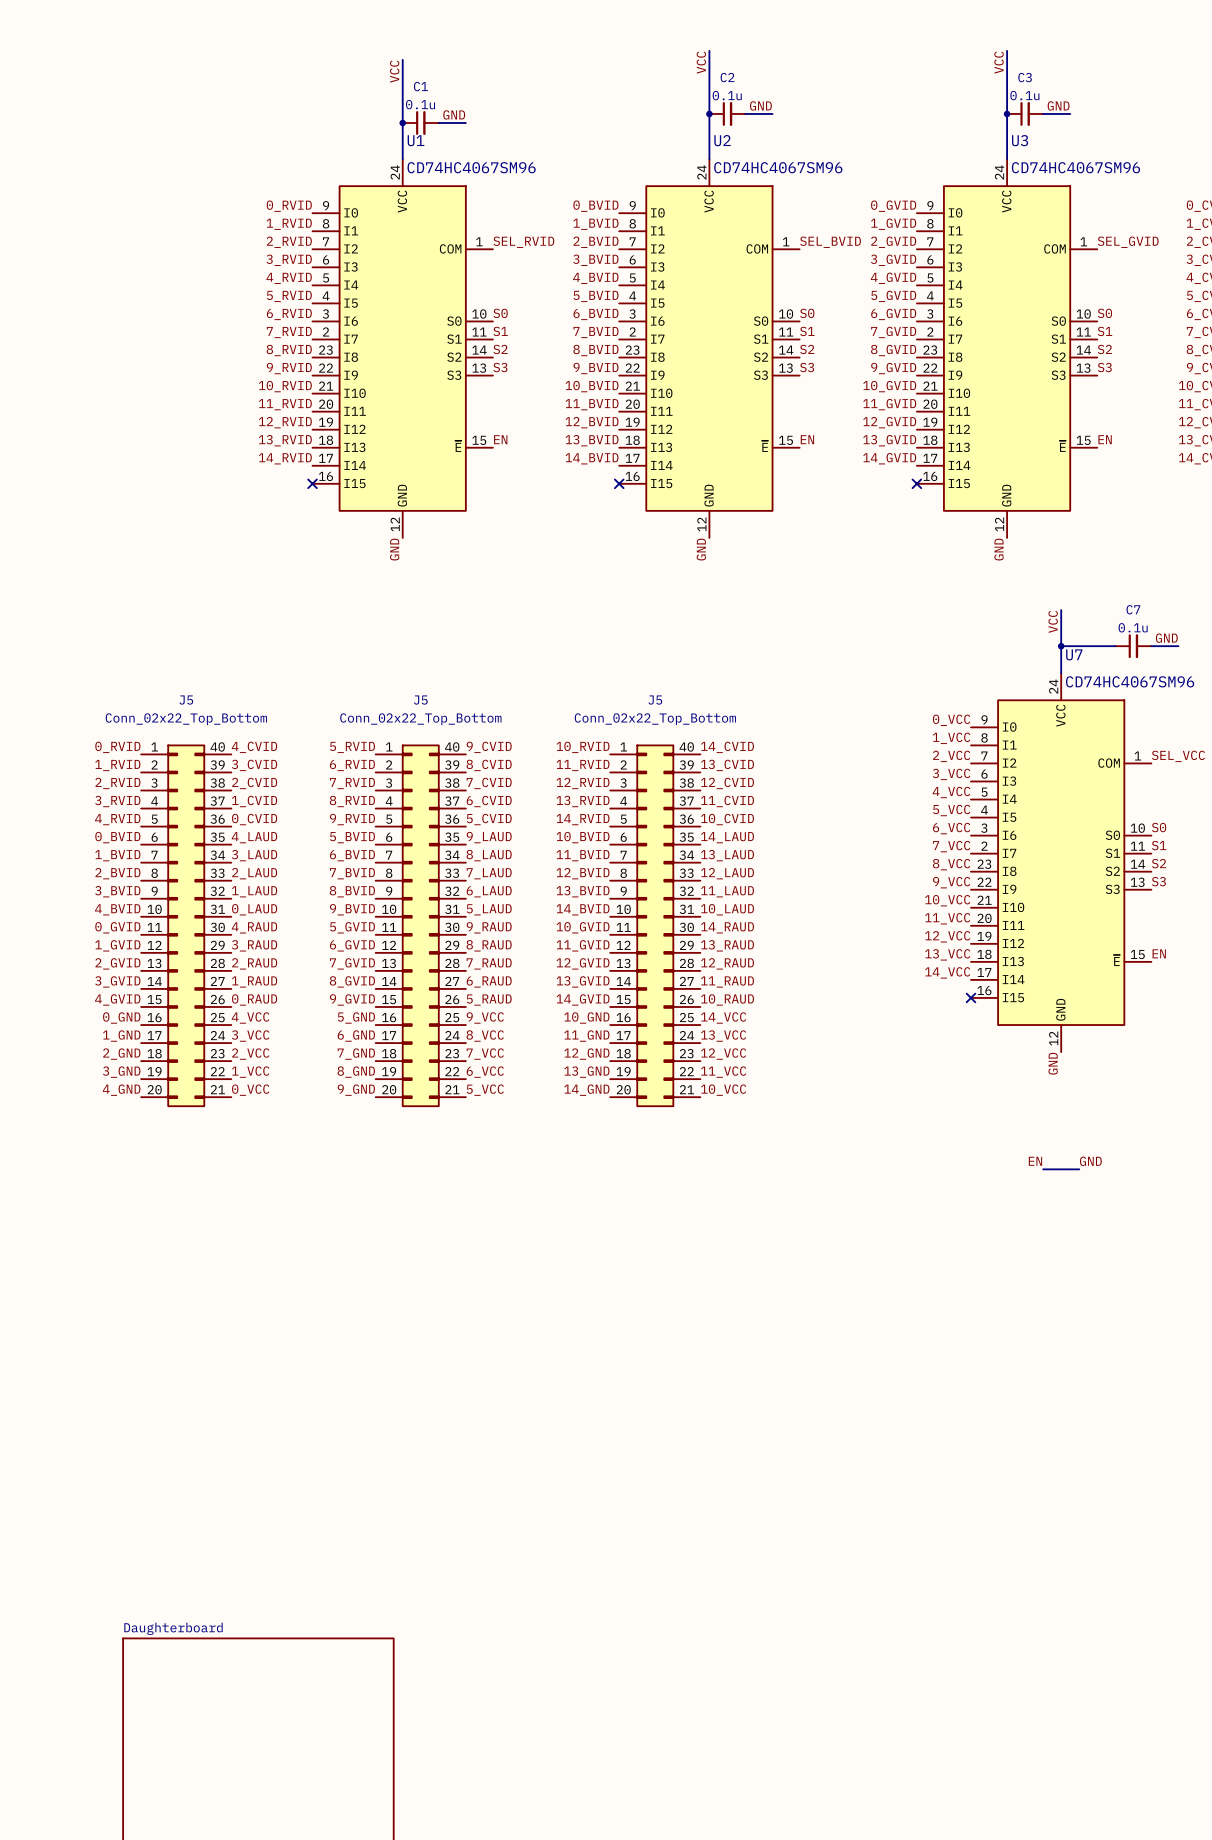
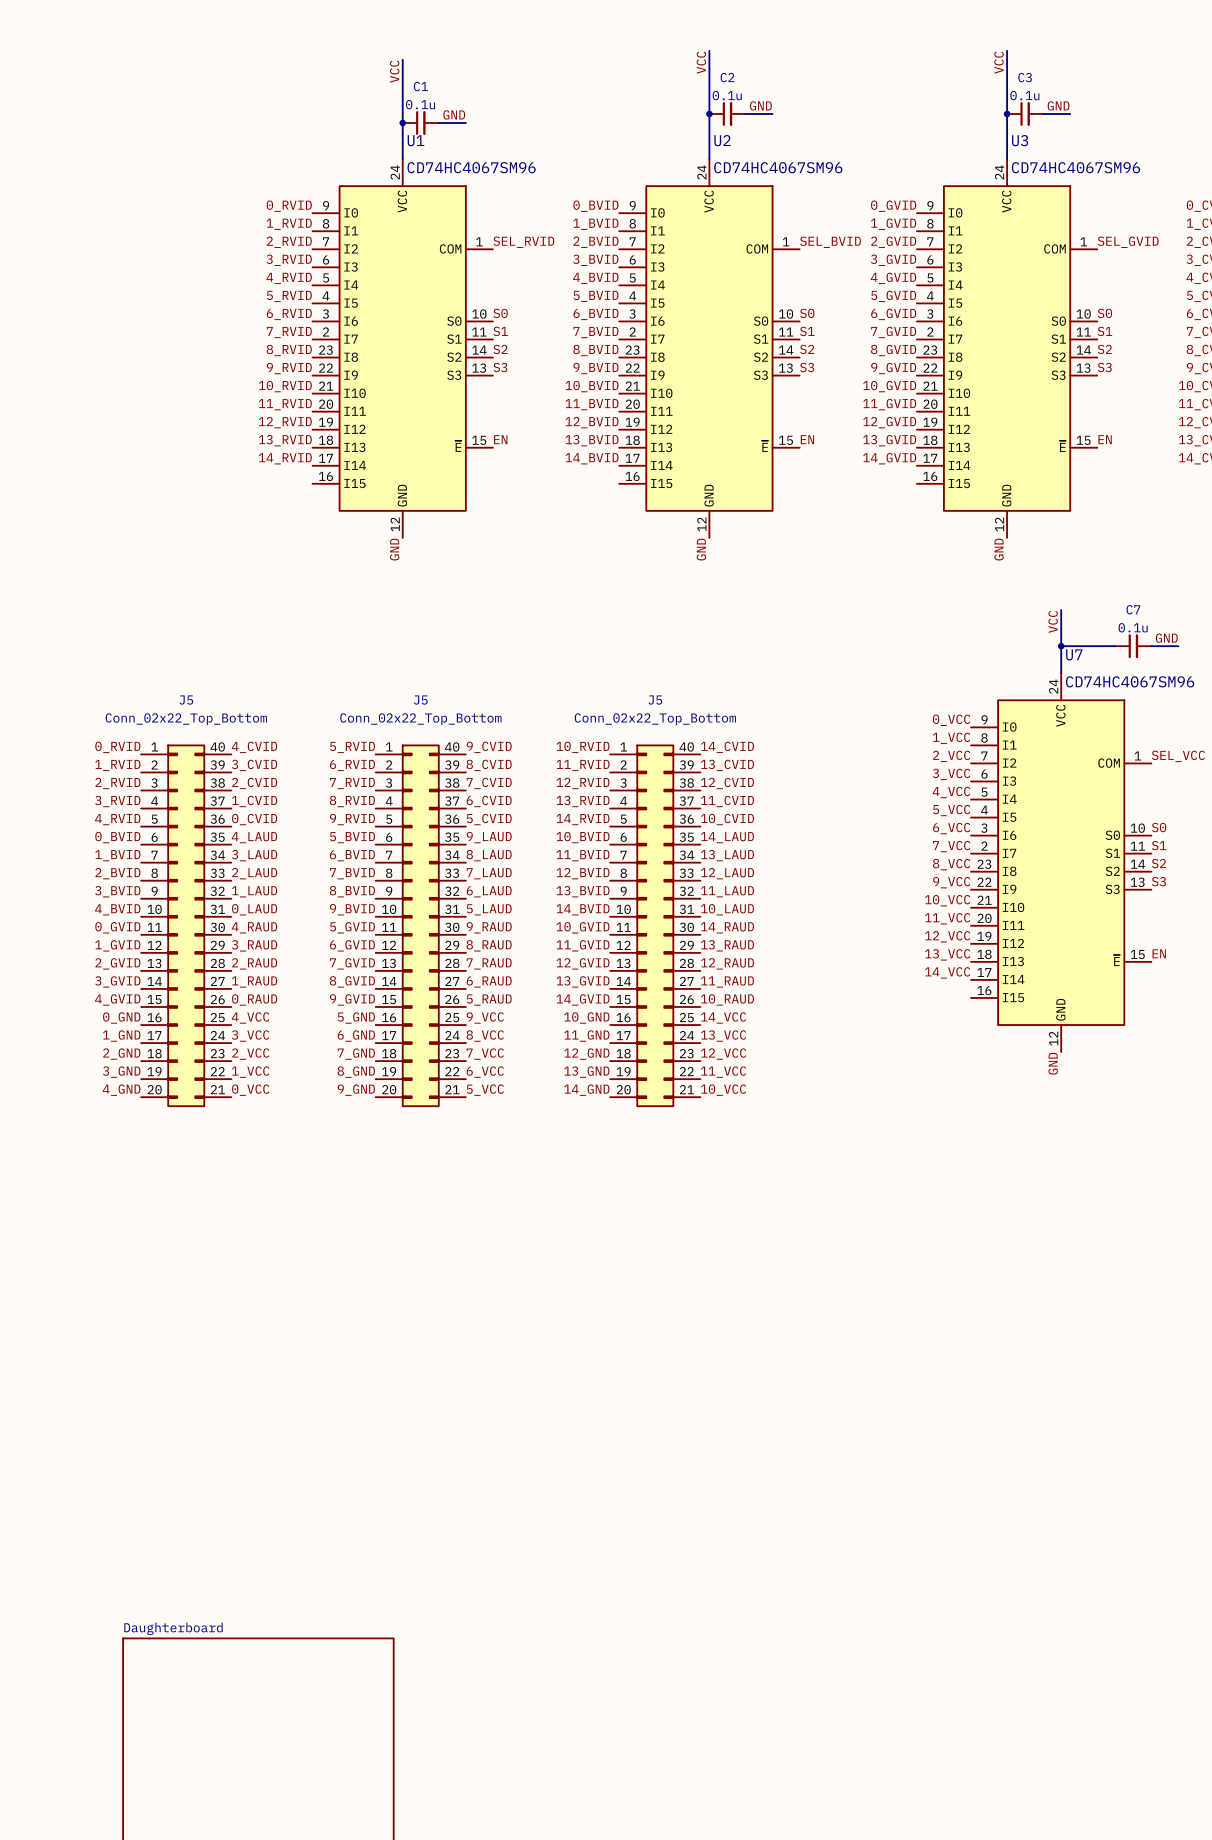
no-connect mark: (312, 483) -> none
no-connect mark: (619, 483) -> none
no-connect mark: (916, 483) -> none
no-connect mark: (970, 997) -> none
label: EN (1035, 1161) -> none
label: GND (1090, 1161) -> none
wire: (1043, 1169) (1079, 1169) -> none

